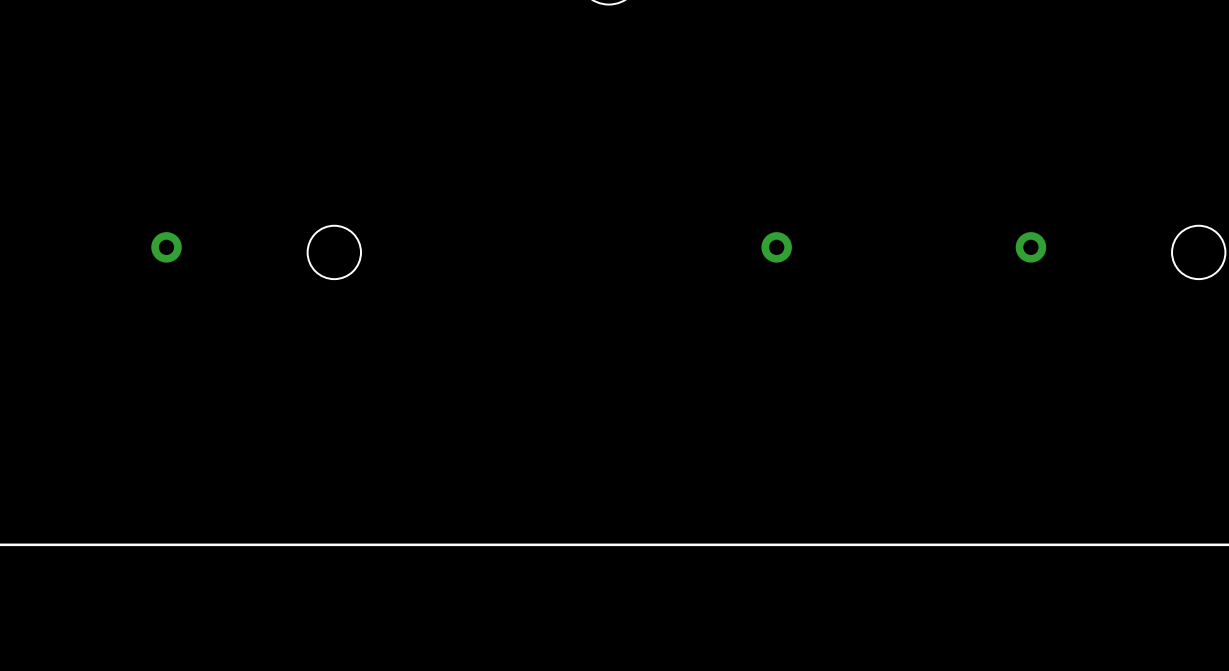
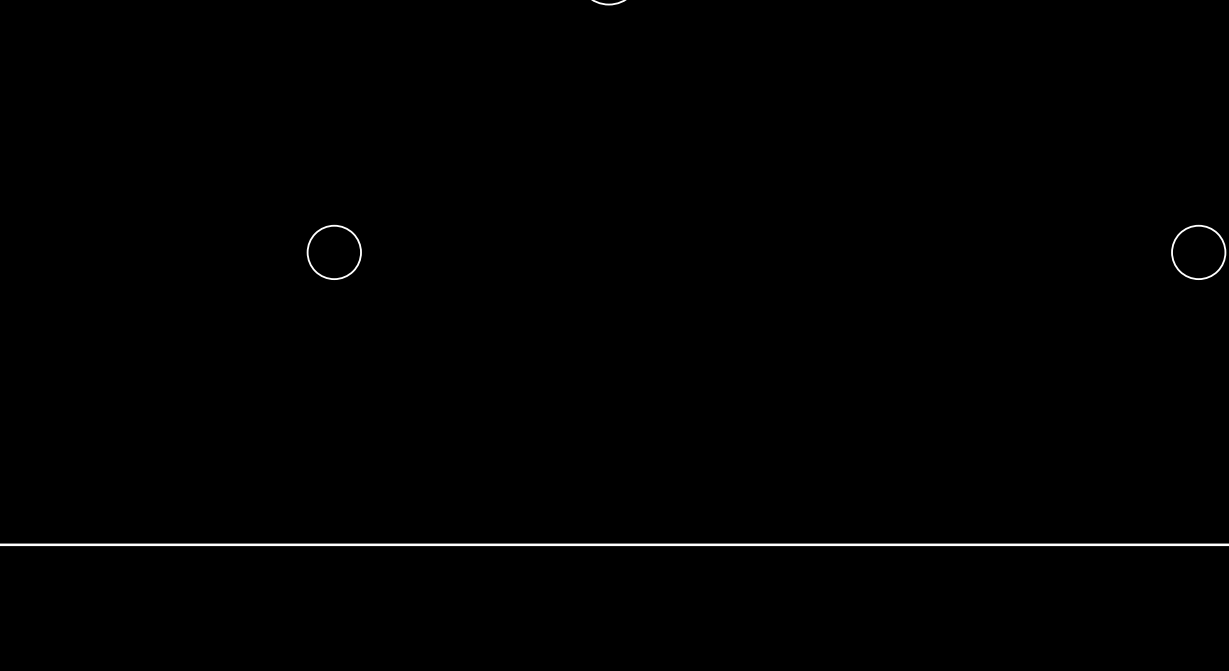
via: (166, 247) -> none
via: (776, 247) -> none
via: (1030, 247) -> none

